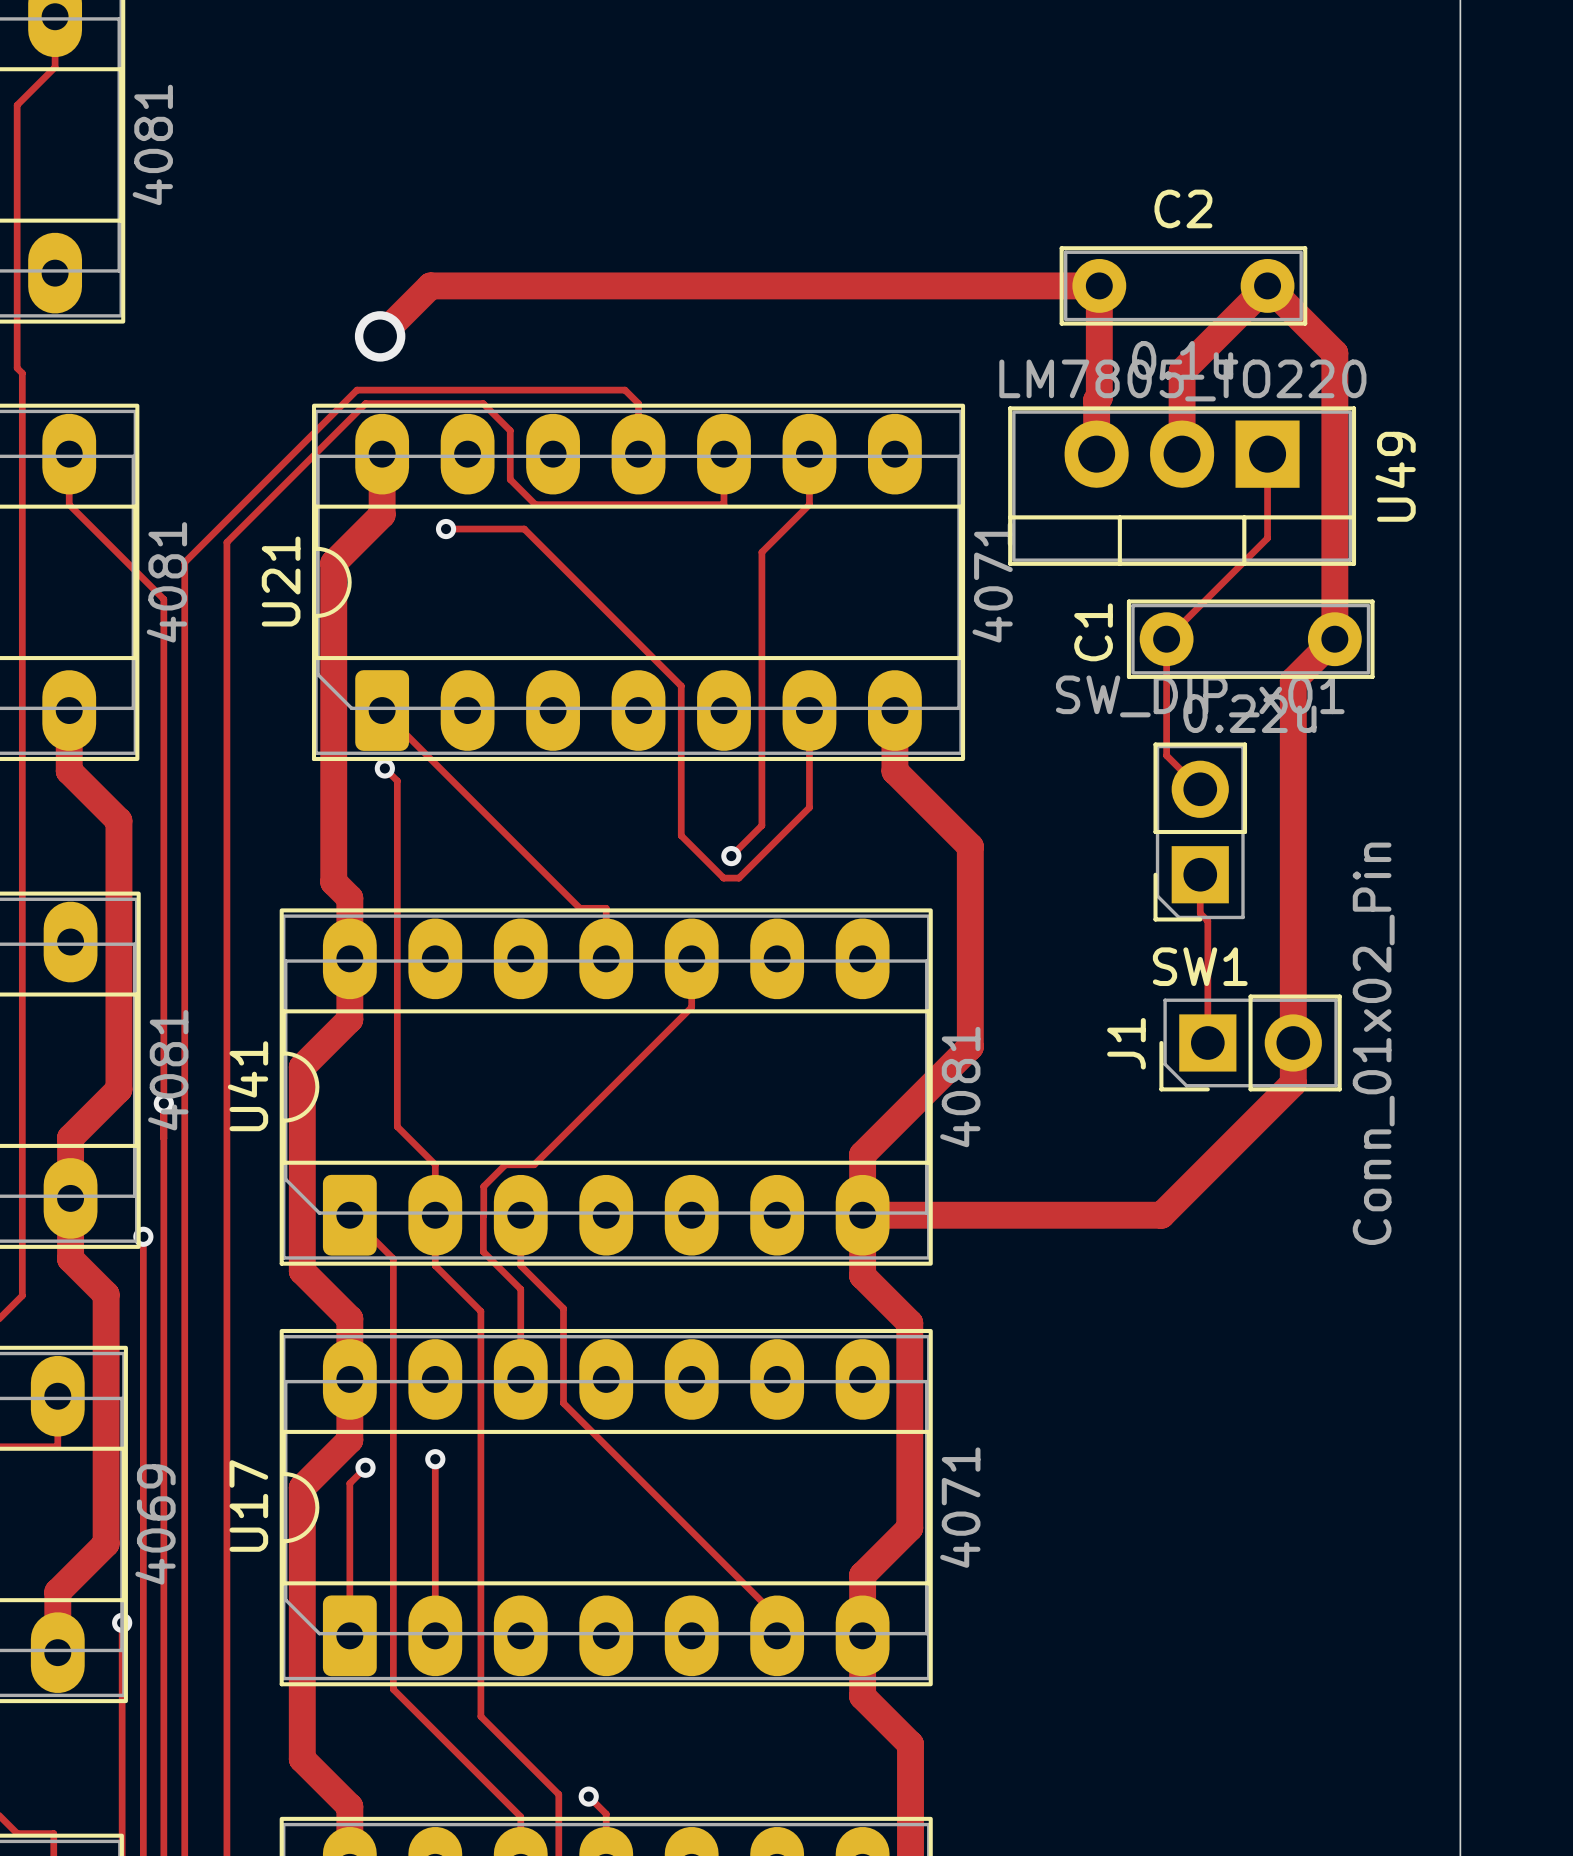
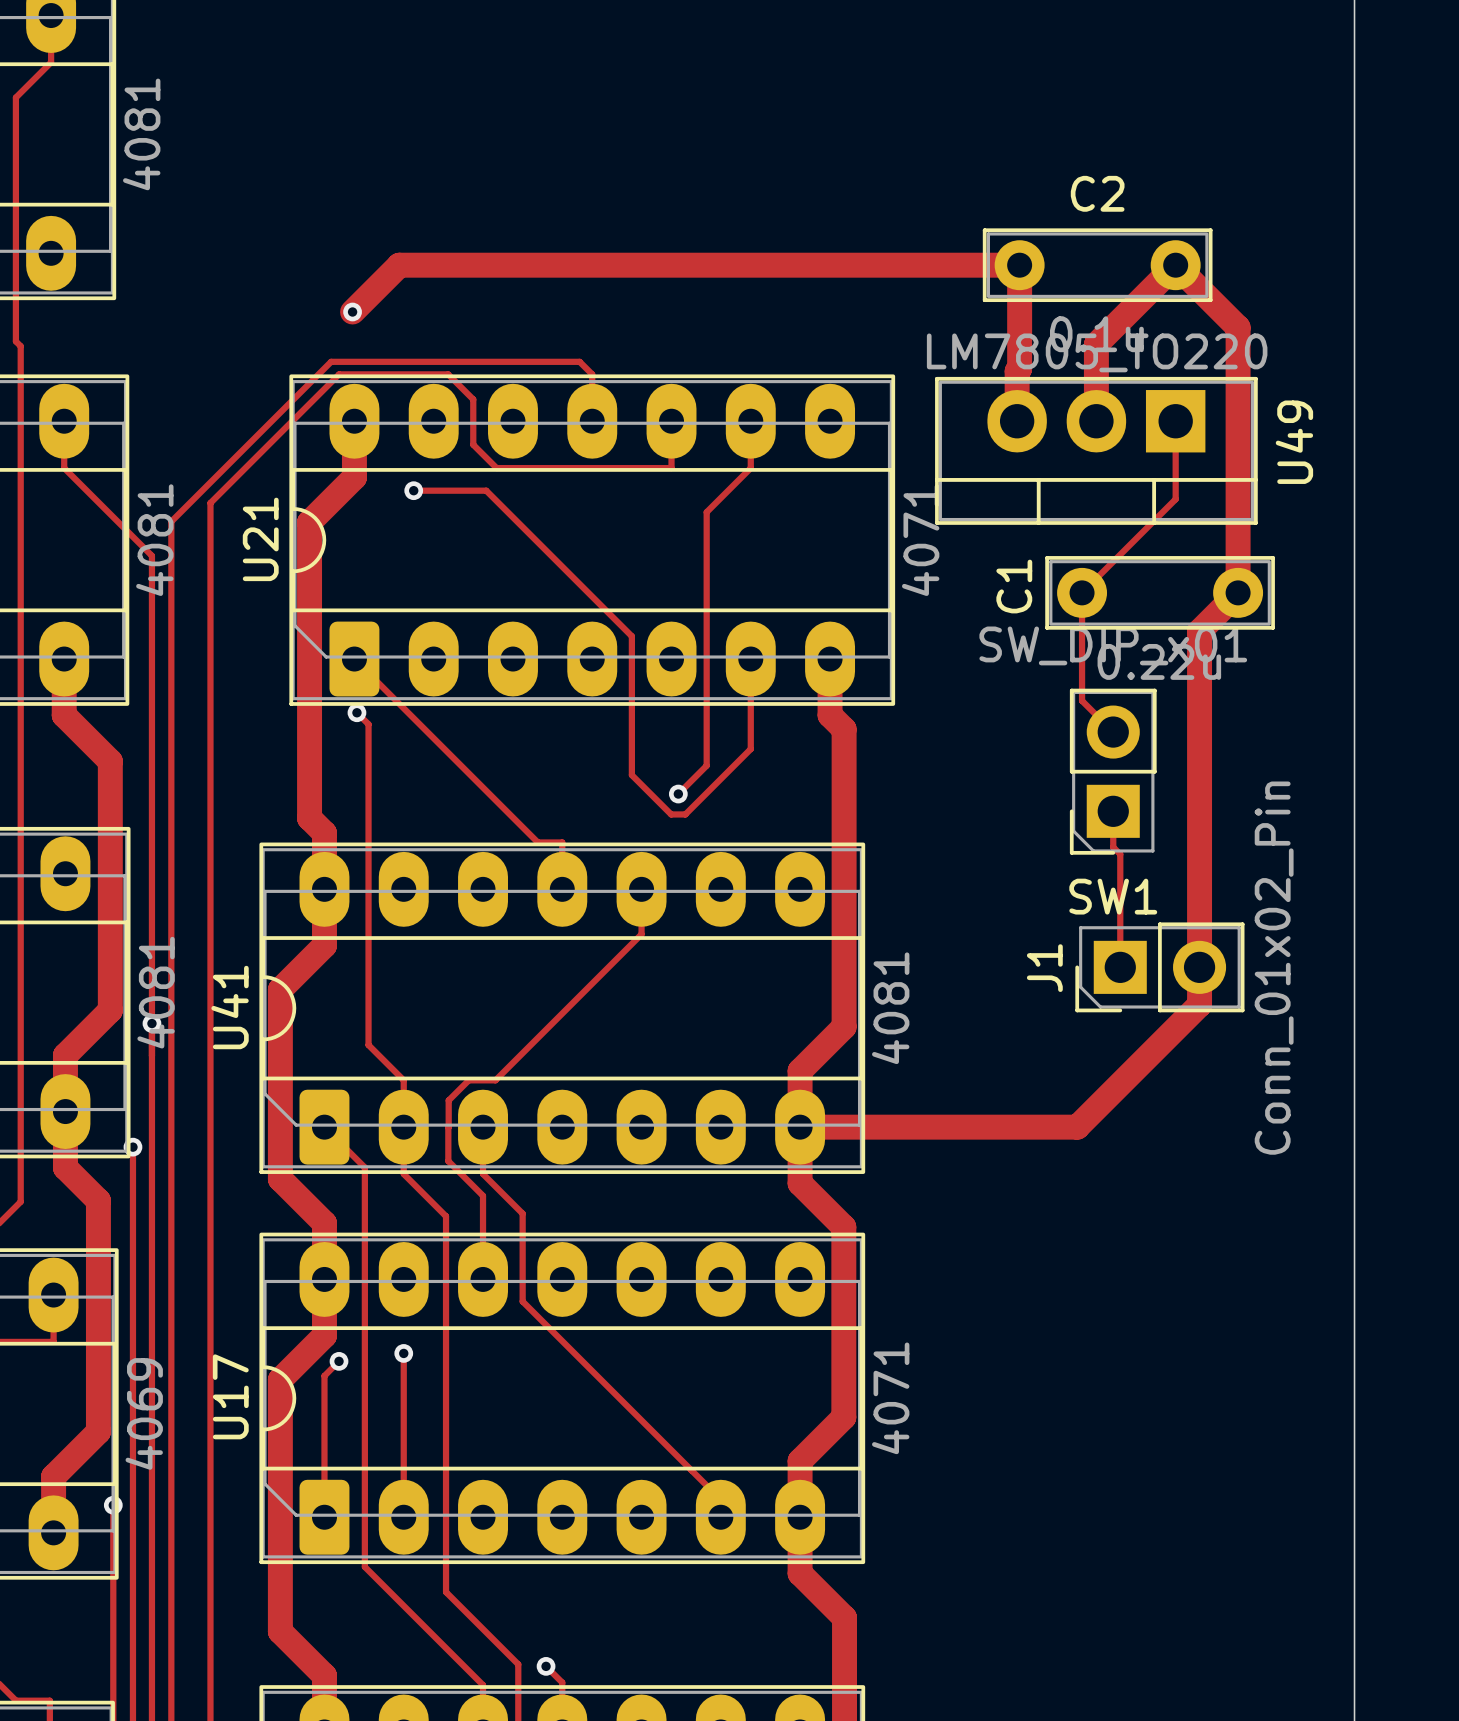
via size: [354, 311, 406, 362] -> [343, 302, 362, 322]
track: (910, 786) (970, 846) (970, 1046) (910, 1107) -> (844, 729) (844, 1026)

